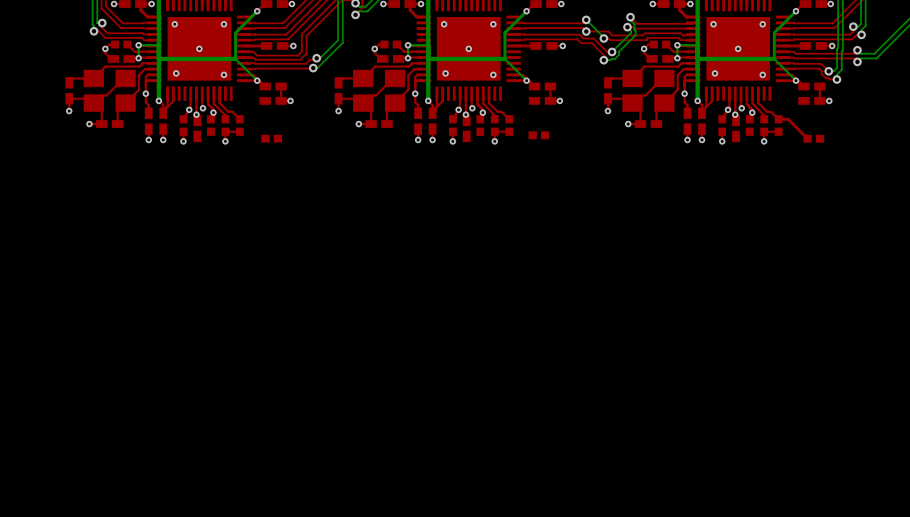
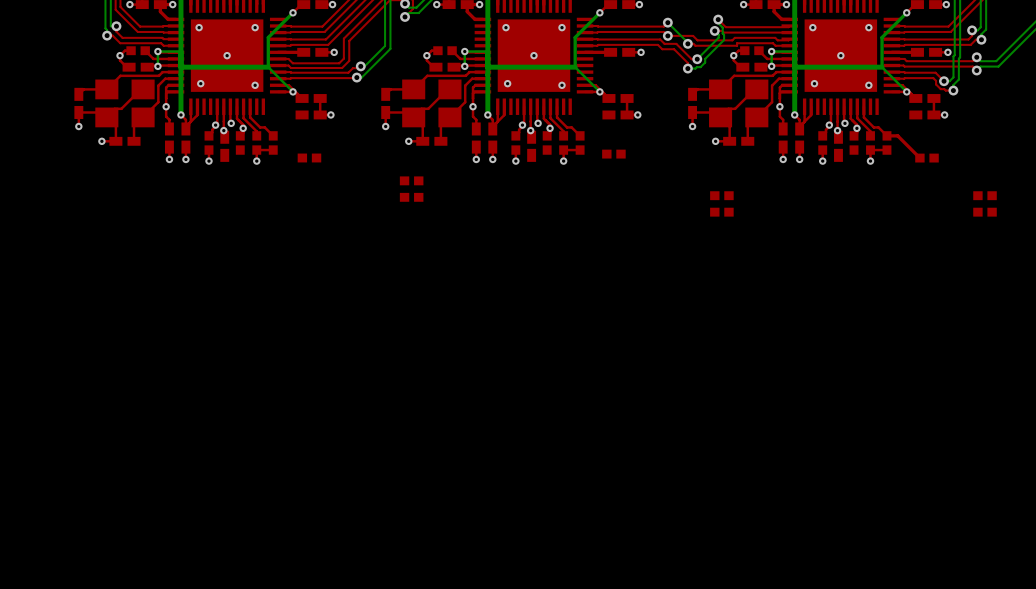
part: none -> (411, 180)
part: none -> (721, 195)
part: none -> (985, 195)
part: none -> (411, 197)
part: none -> (721, 212)
part: none -> (985, 212)

